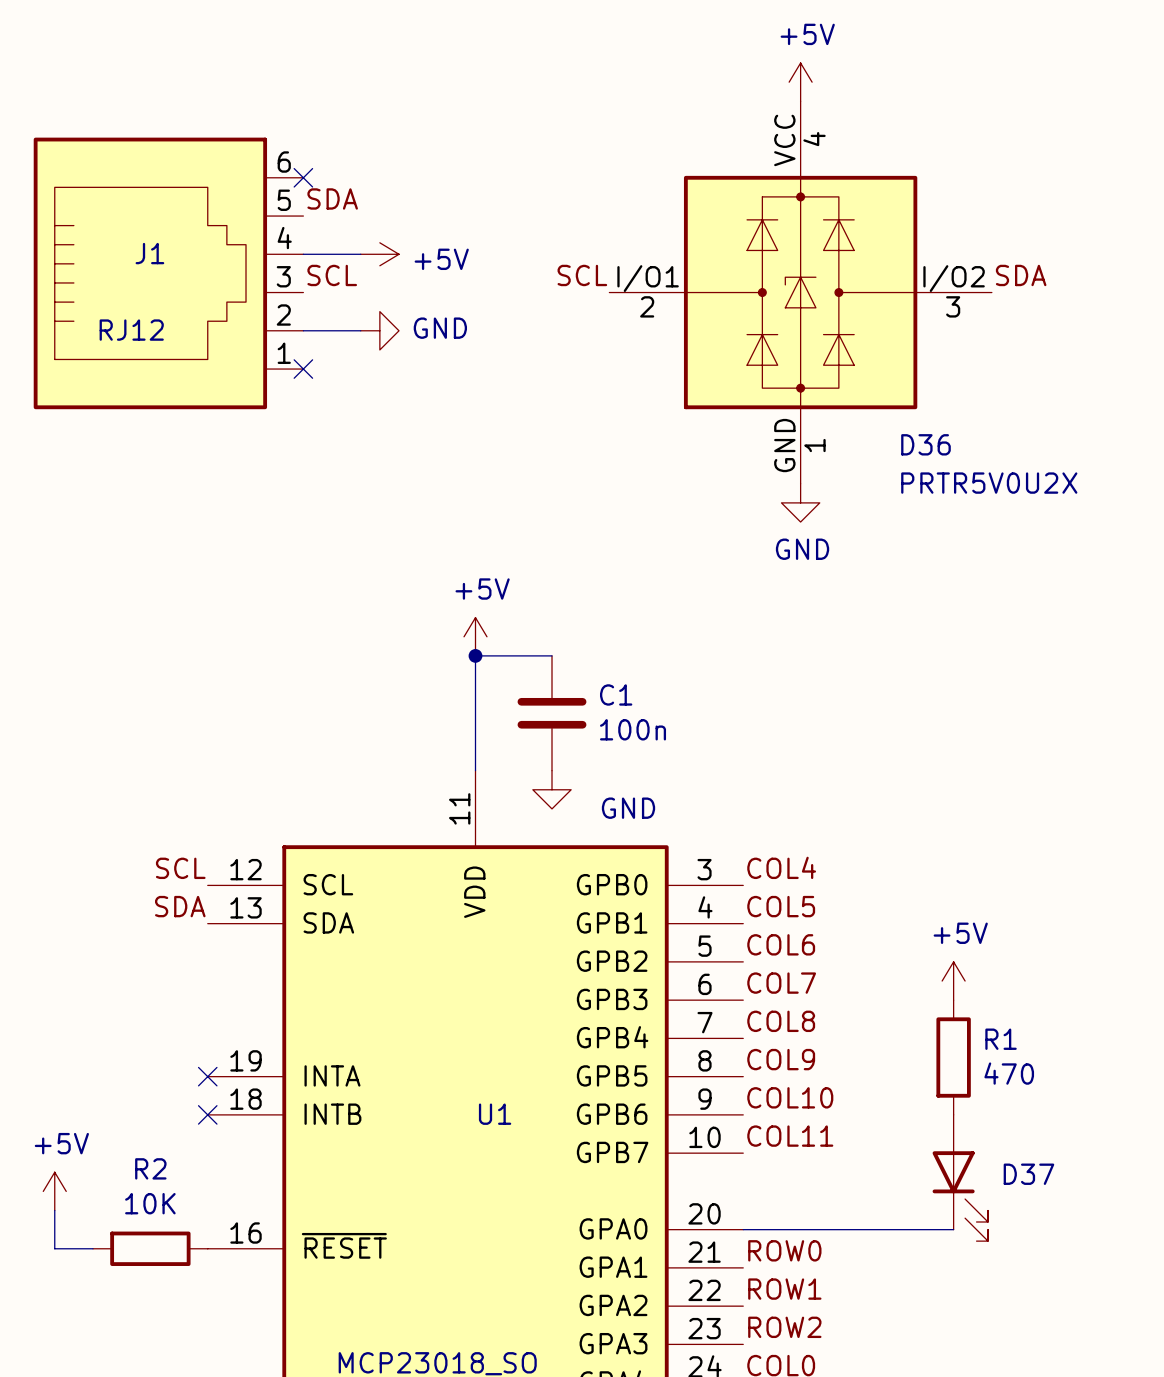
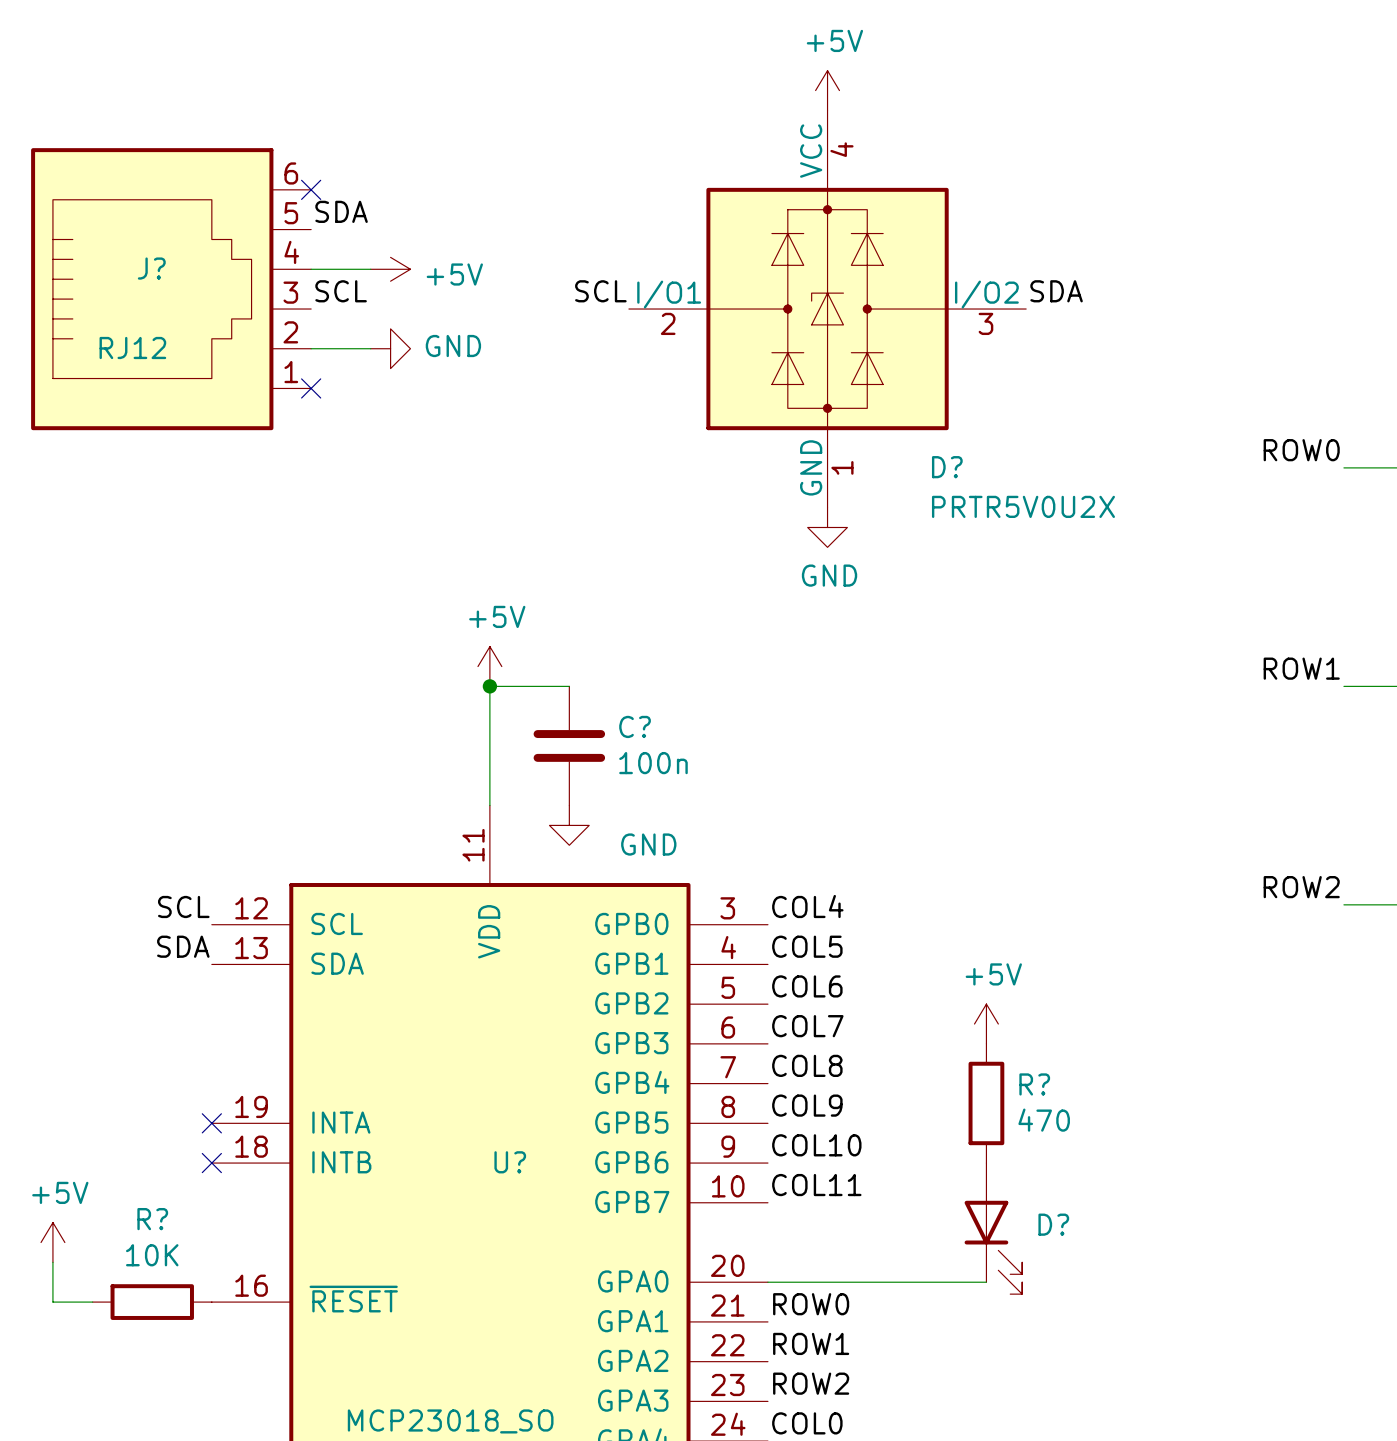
J1 name: J1 (149, 253) -> J? (151, 268)
D36 name: D36 (925, 444) -> D? (947, 467)
C1 name: C1 (616, 694) -> C? (635, 726)
R1 name: R1 (1001, 1039) -> R? (1034, 1084)
U1 name: U1 (495, 1114) -> U? (510, 1162)
R2 name: R2 (150, 1168) -> R? (152, 1219)
D37 name: D37 (1028, 1174) -> D? (1053, 1224)

